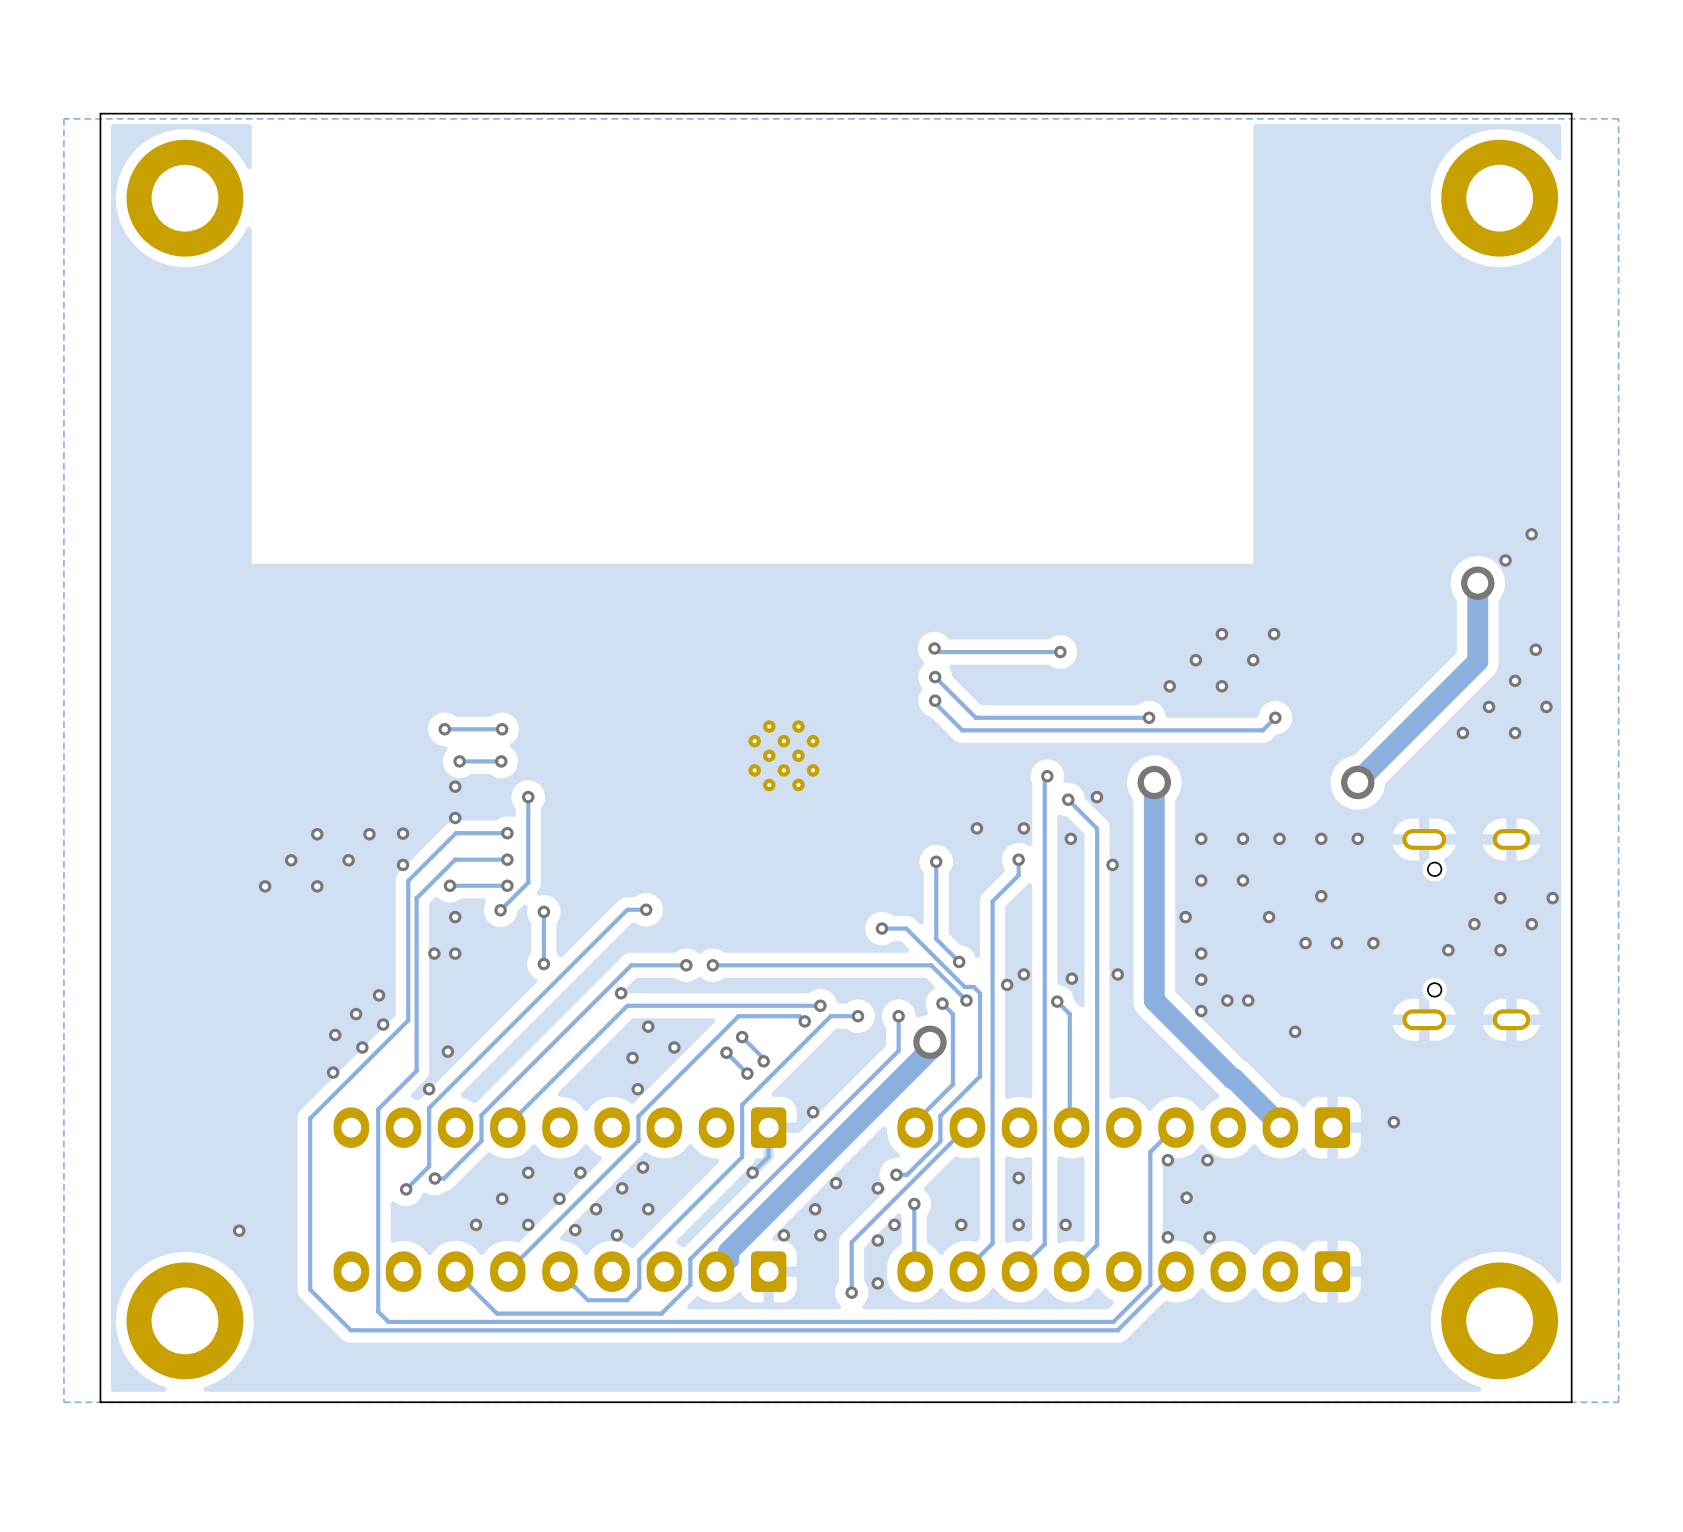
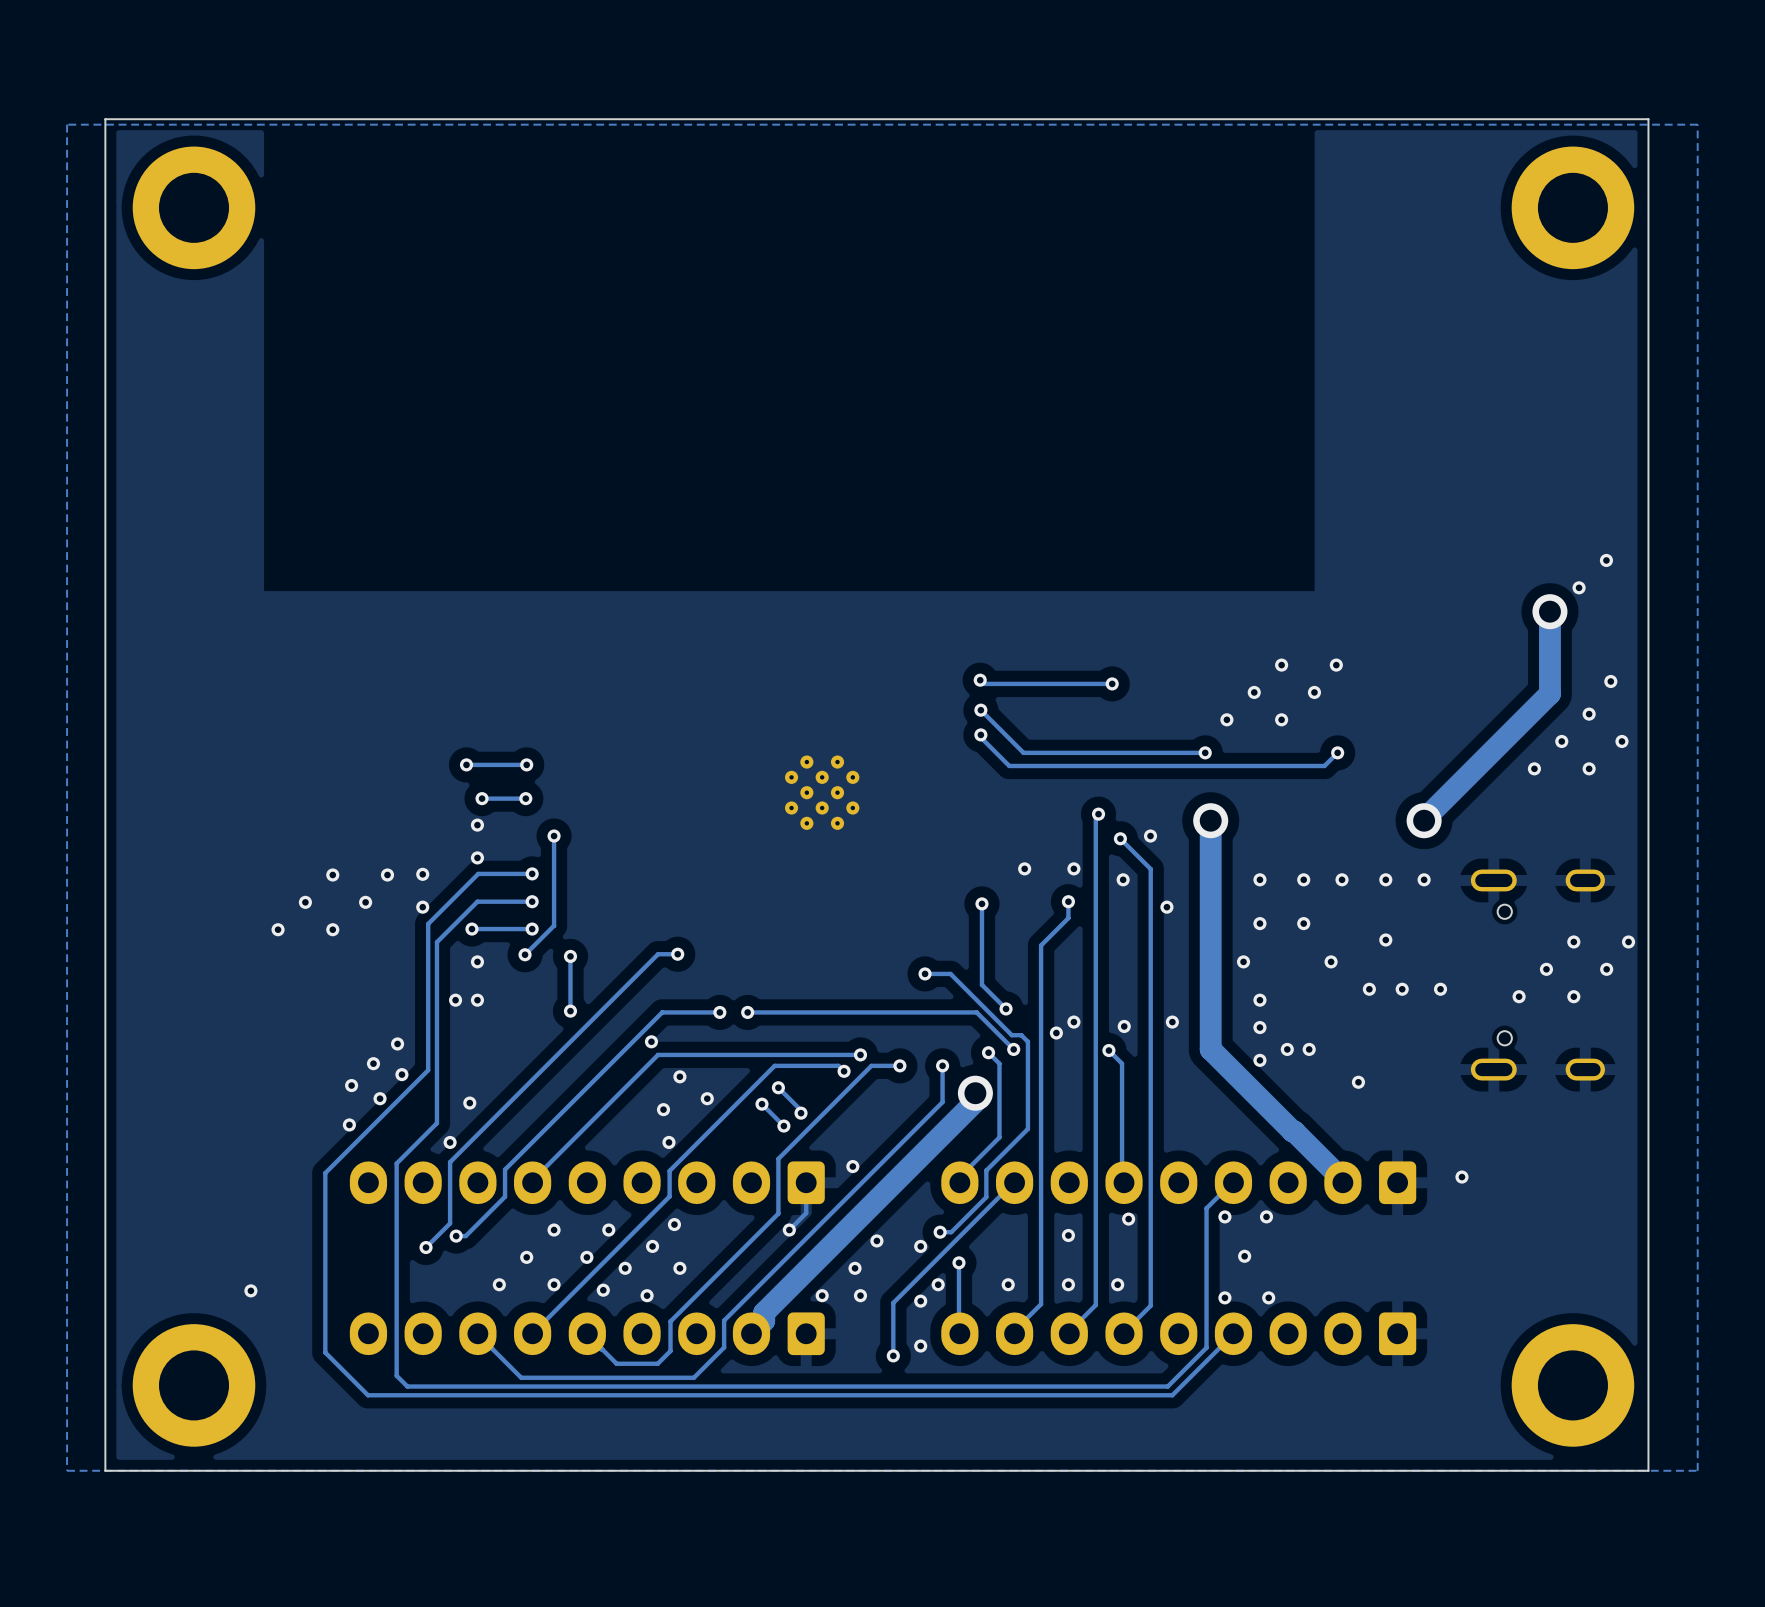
via: none -> (1128, 1219)

